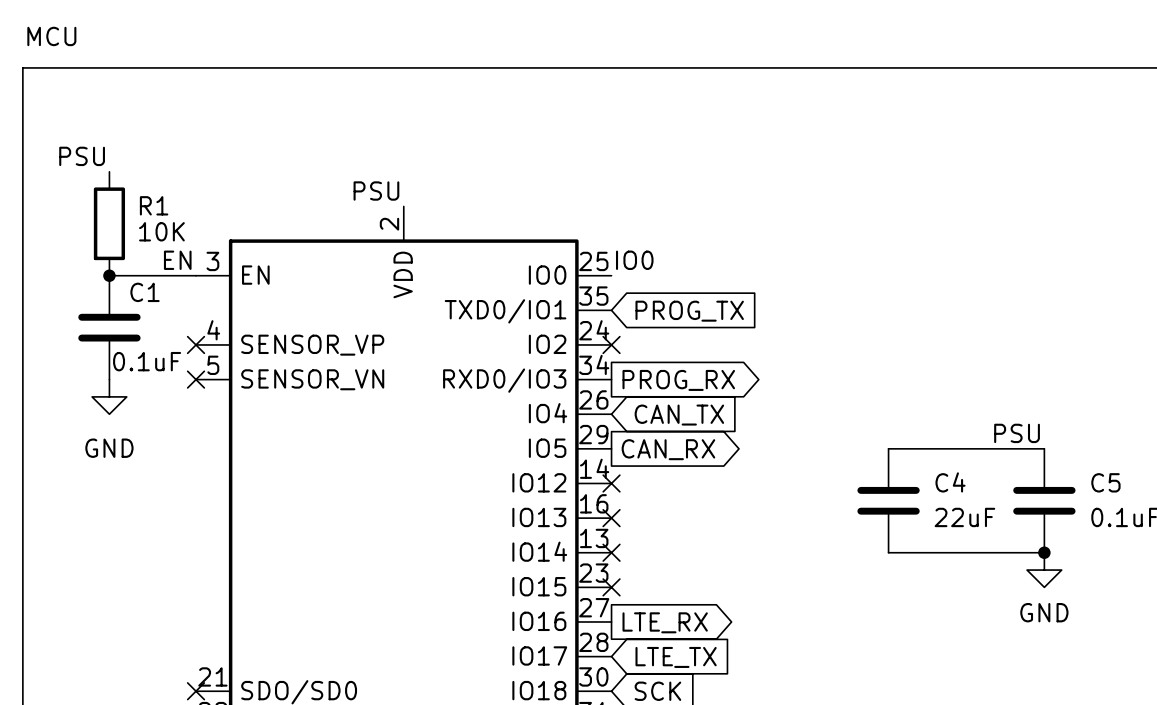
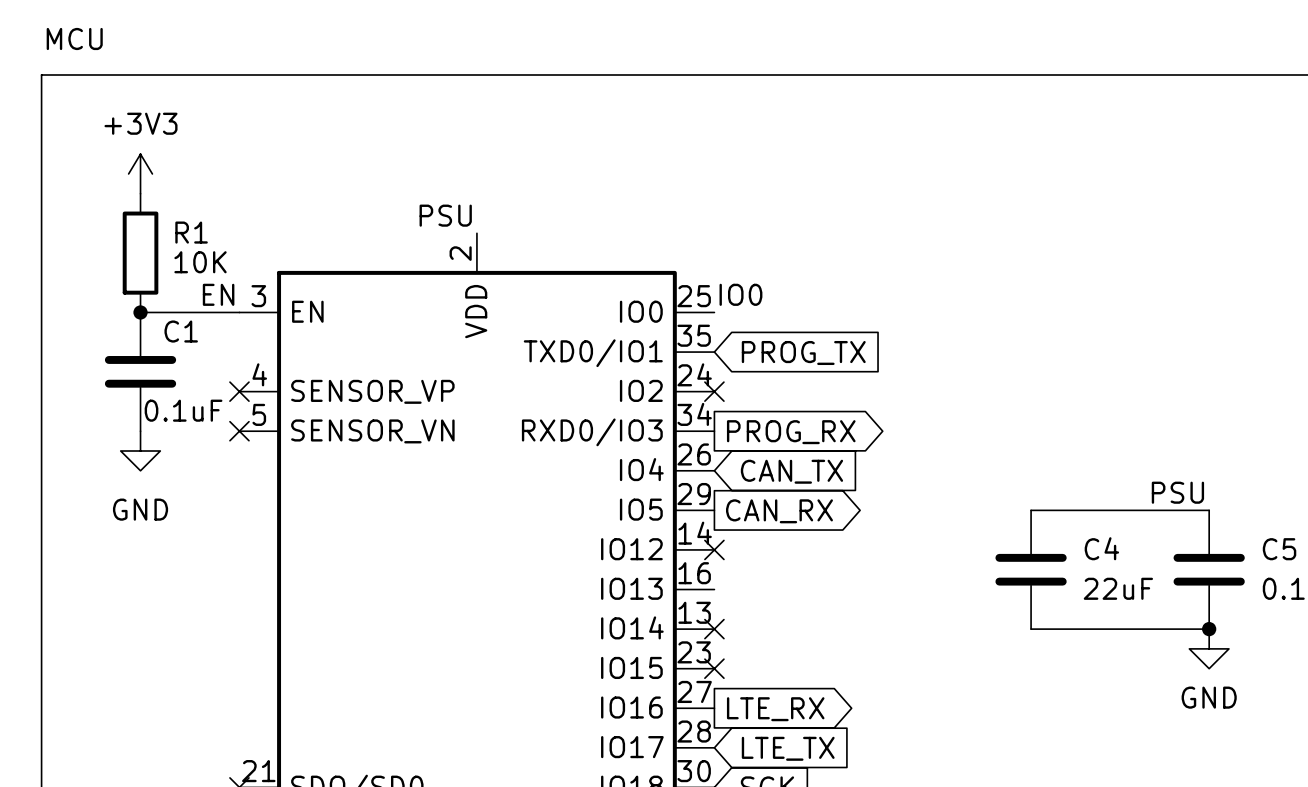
power symbol: none -> +3V3 (140, 173)
label: PSU (82, 156) -> none
no-connect mark: (611, 518) -> none

